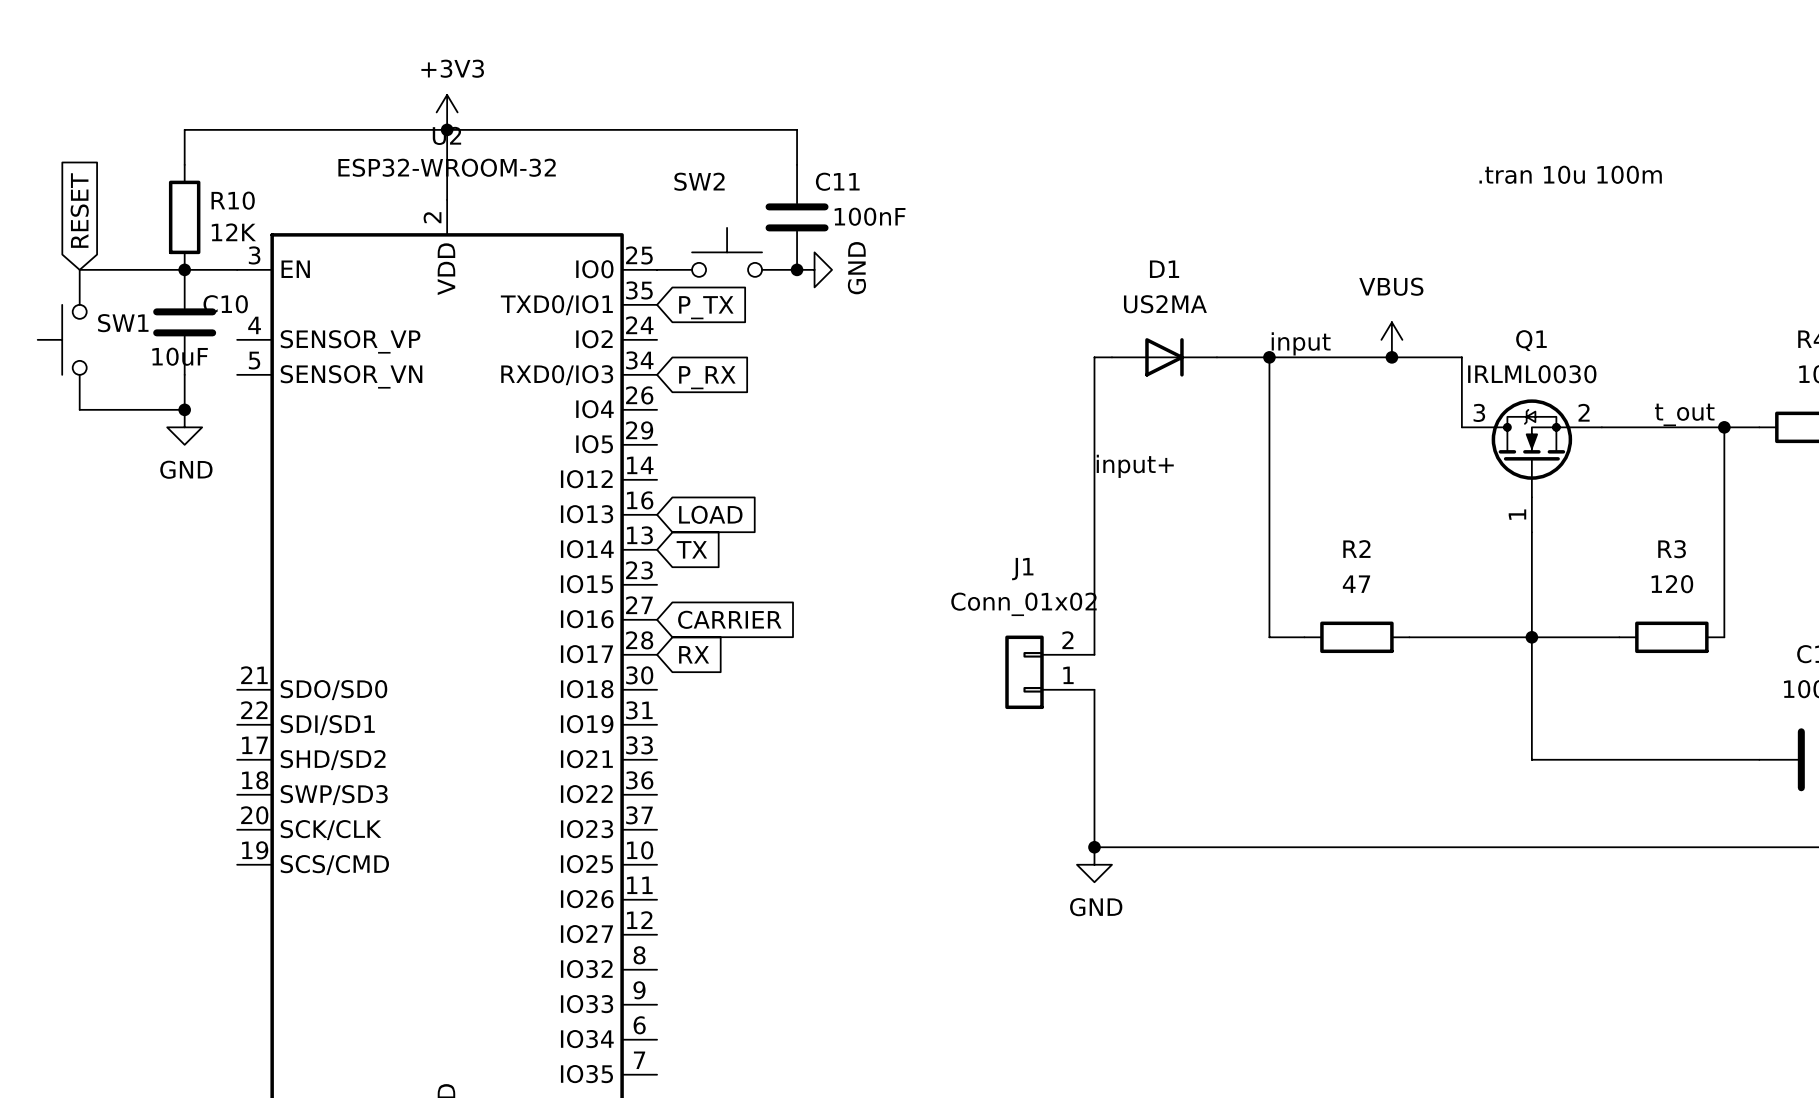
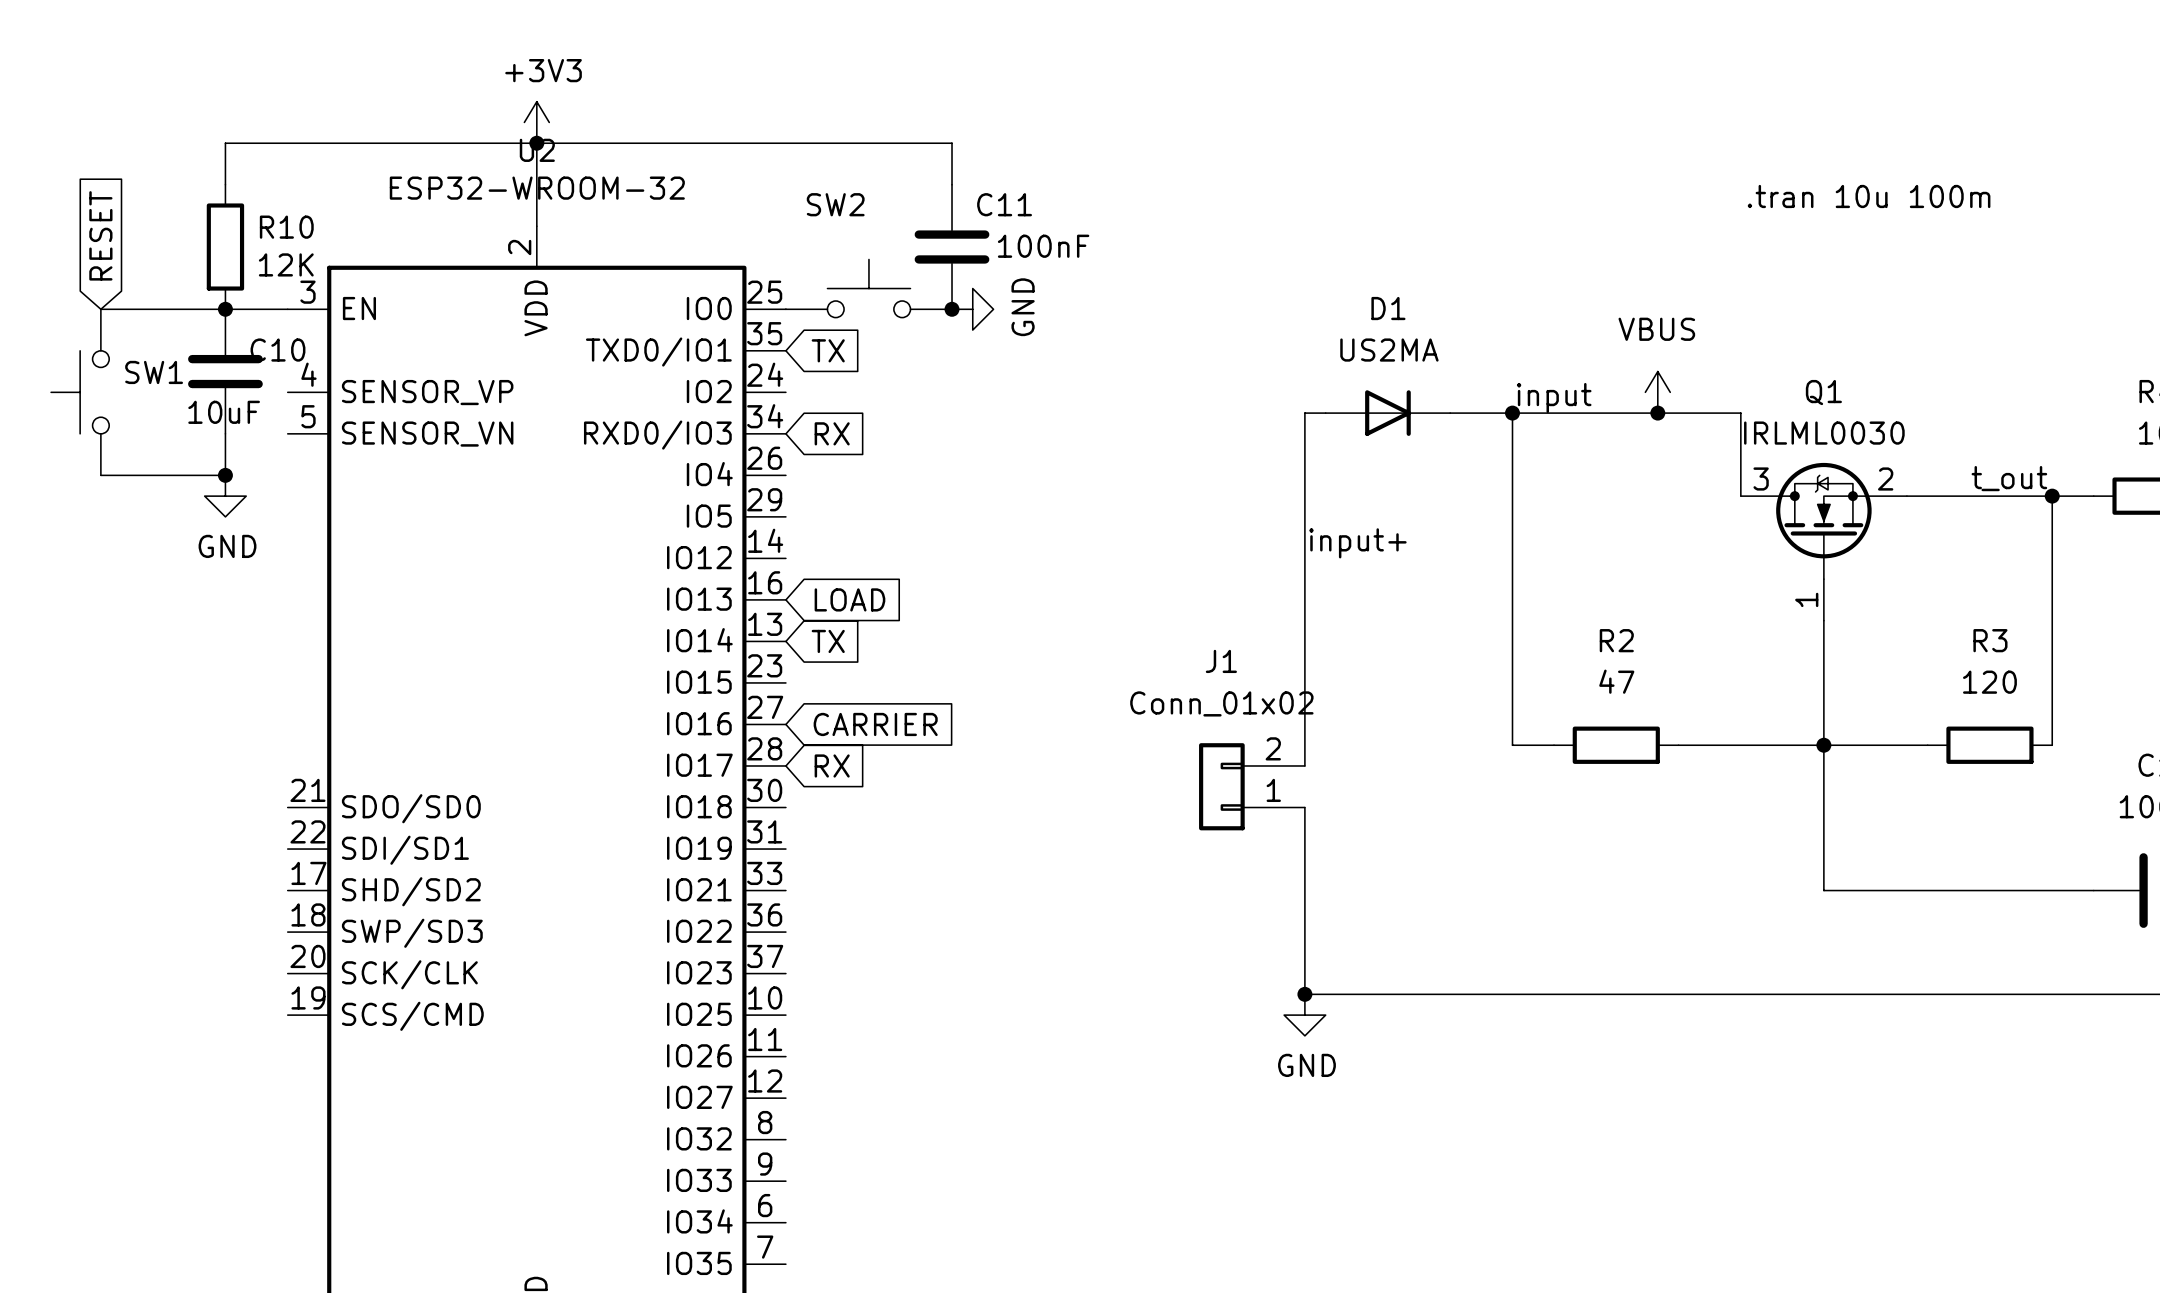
global label: P_TX (706, 307) -> TX (828, 350)
global label: P_RX (707, 377) -> RX (832, 433)

